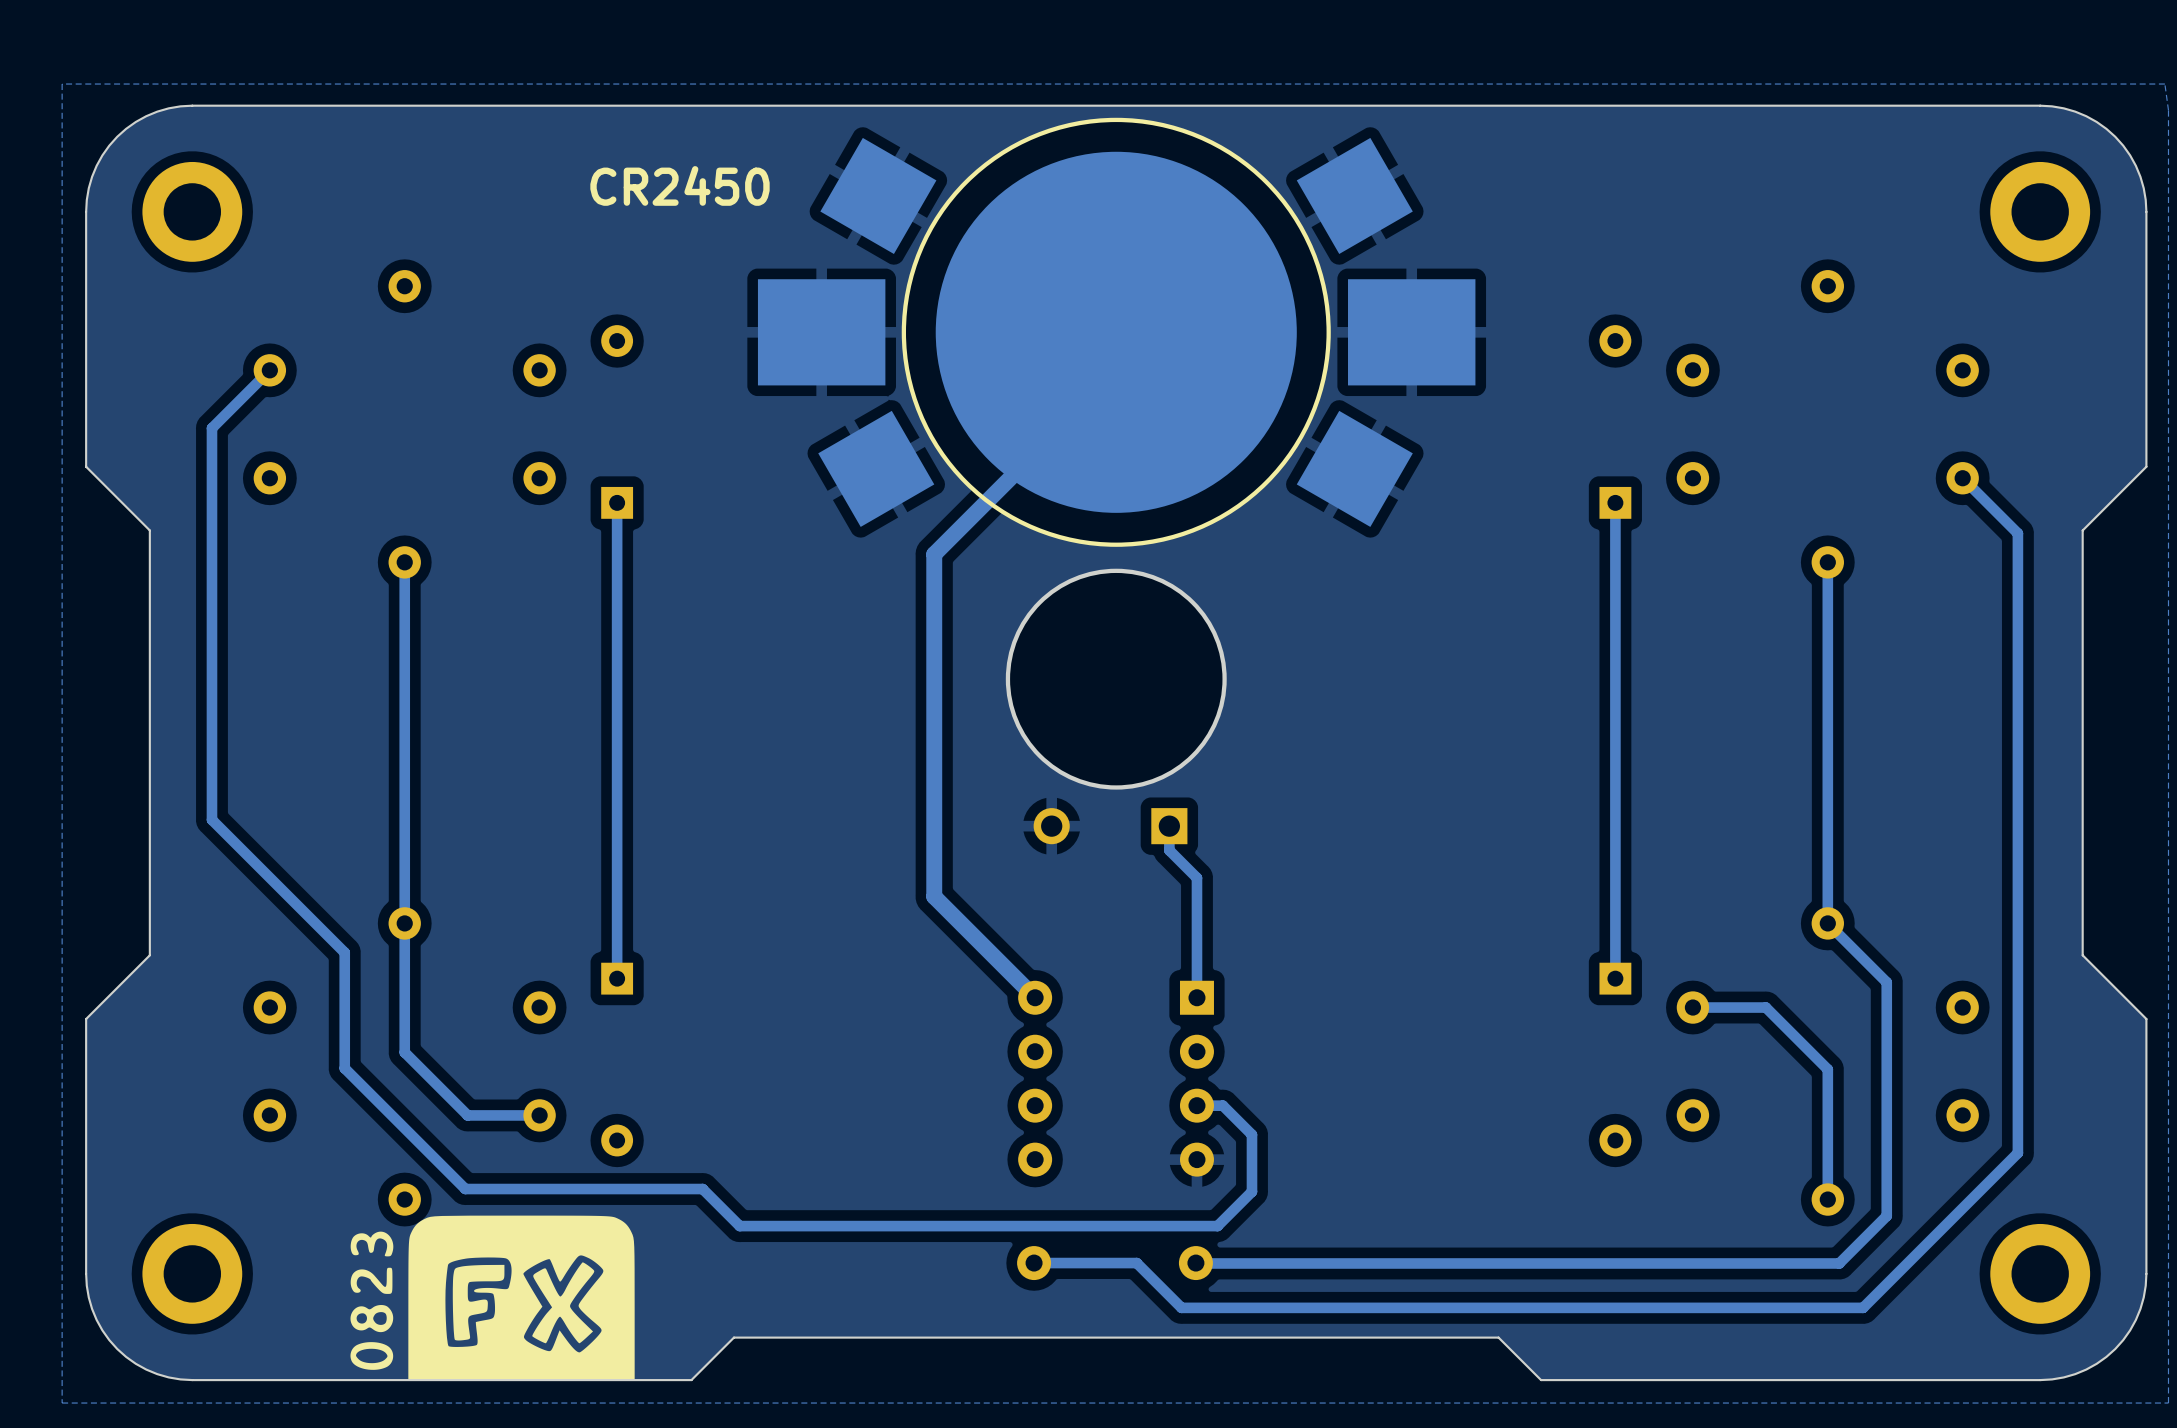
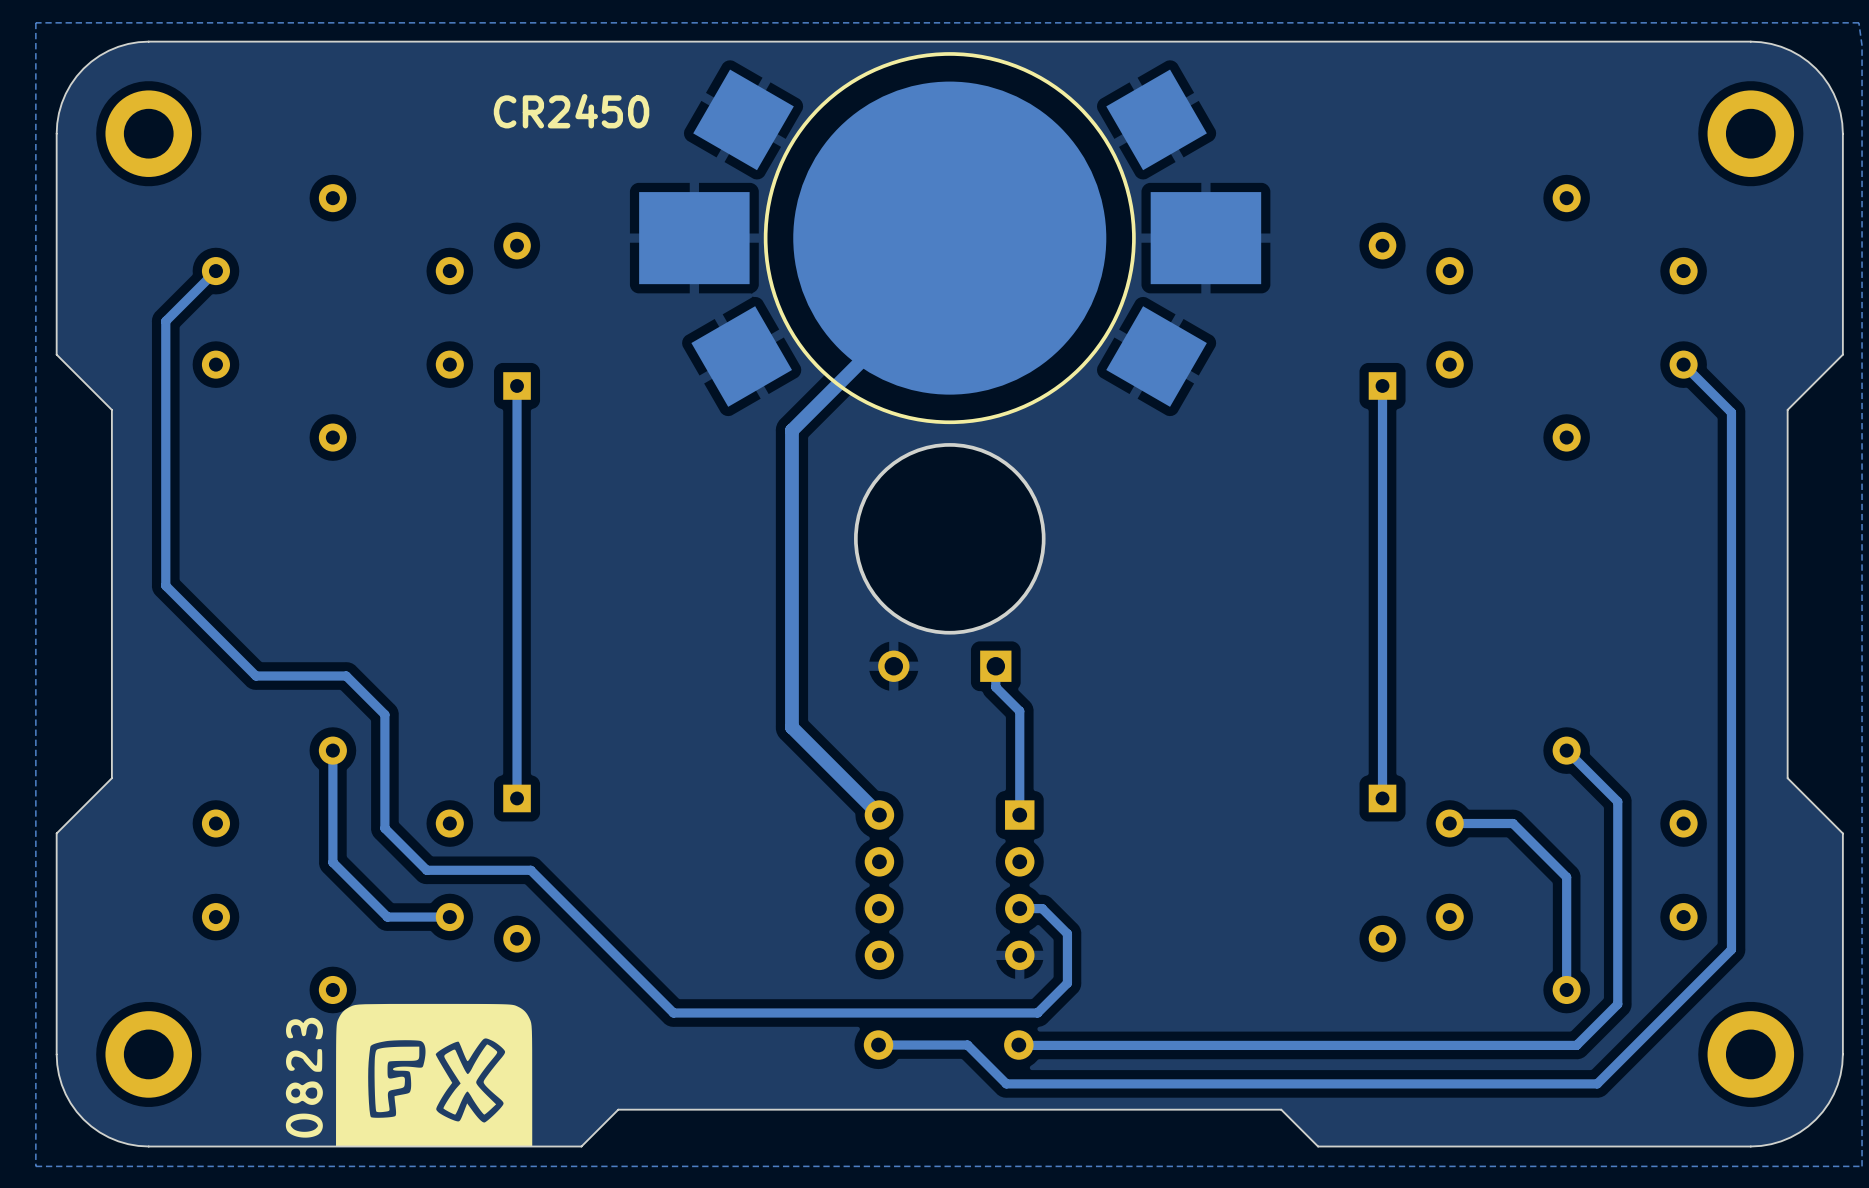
track: (404, 562) (404, 923) -> none
track: (1827, 562) (1827, 923) -> none
track: (211, 733) (211, 819) (344, 952) (344, 1068) (465, 1189) (702, 1189) (739, 1226) (797, 1226) -> (165, 585) (256, 676) (346, 676) (384, 714) (384, 828) (426, 870) (530, 870) (673, 1013)

